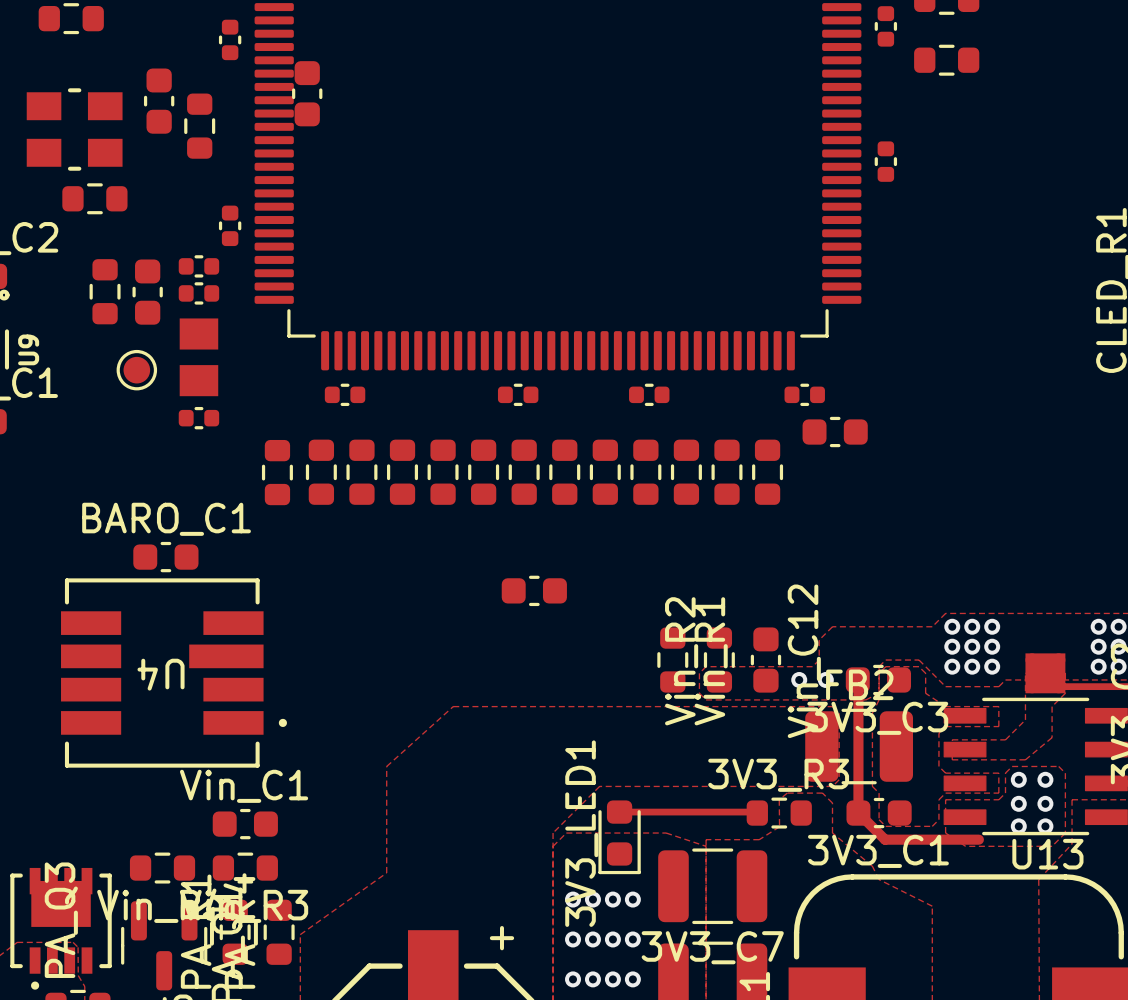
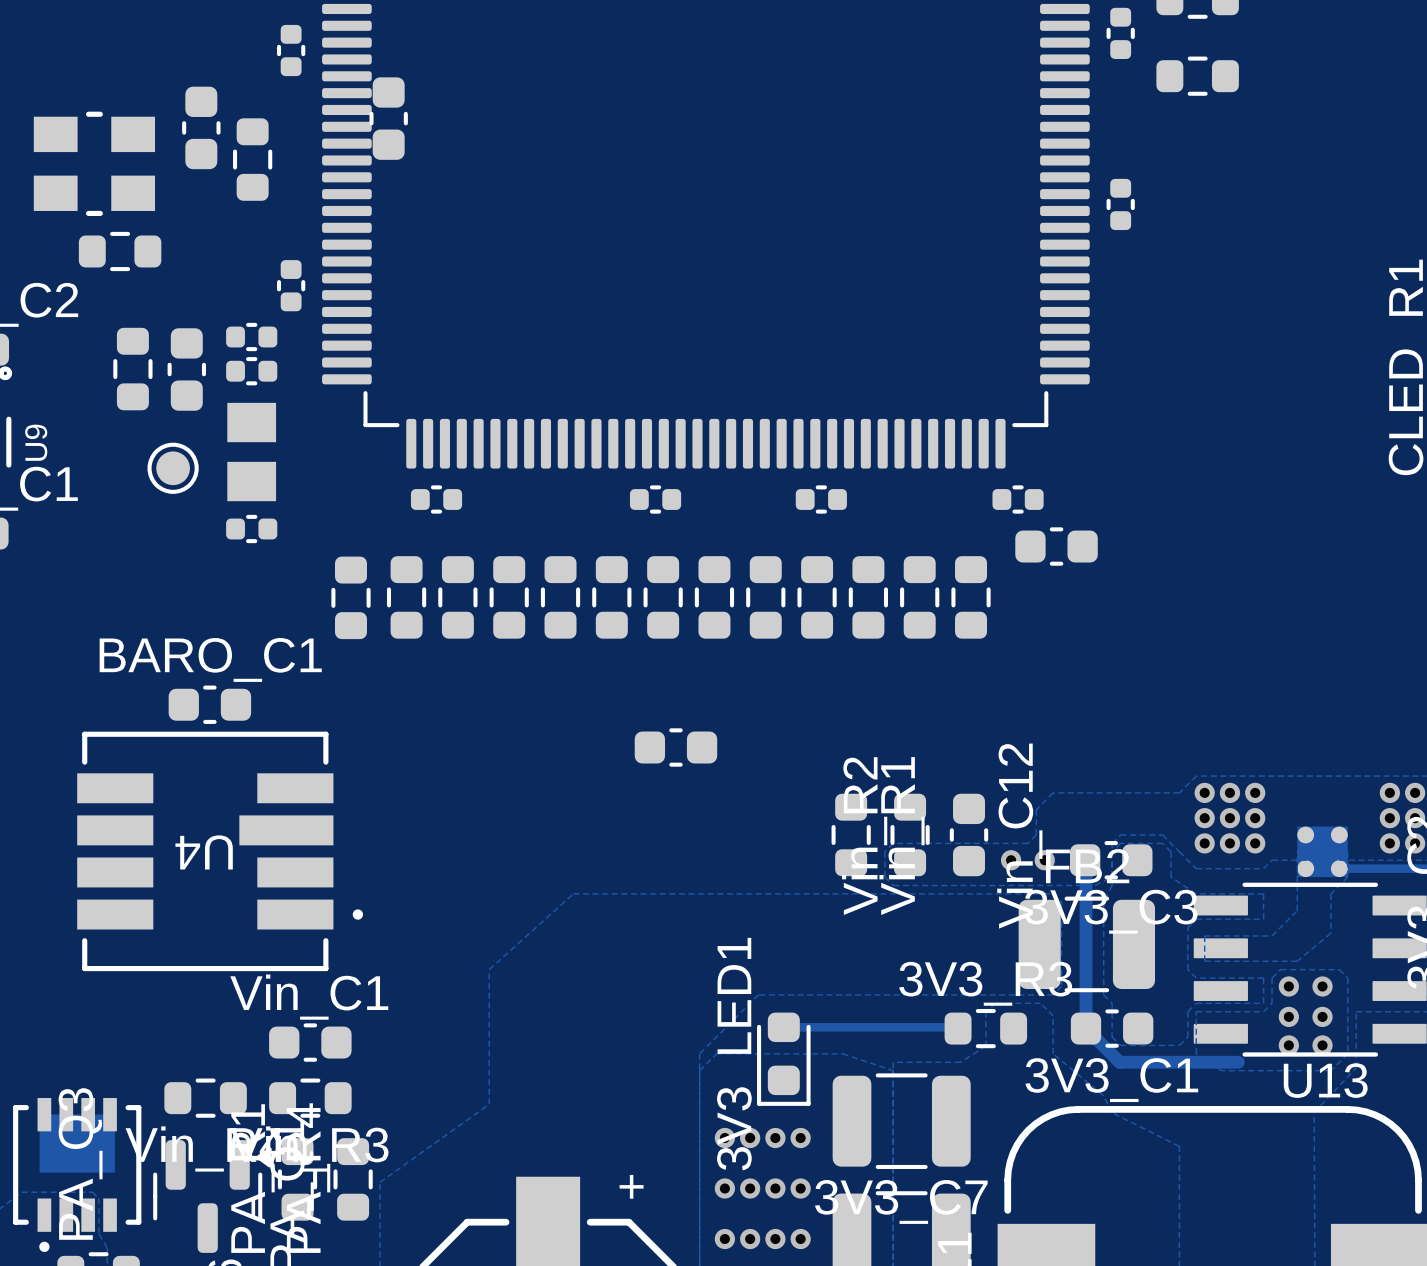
part: (71, 18) -> none

